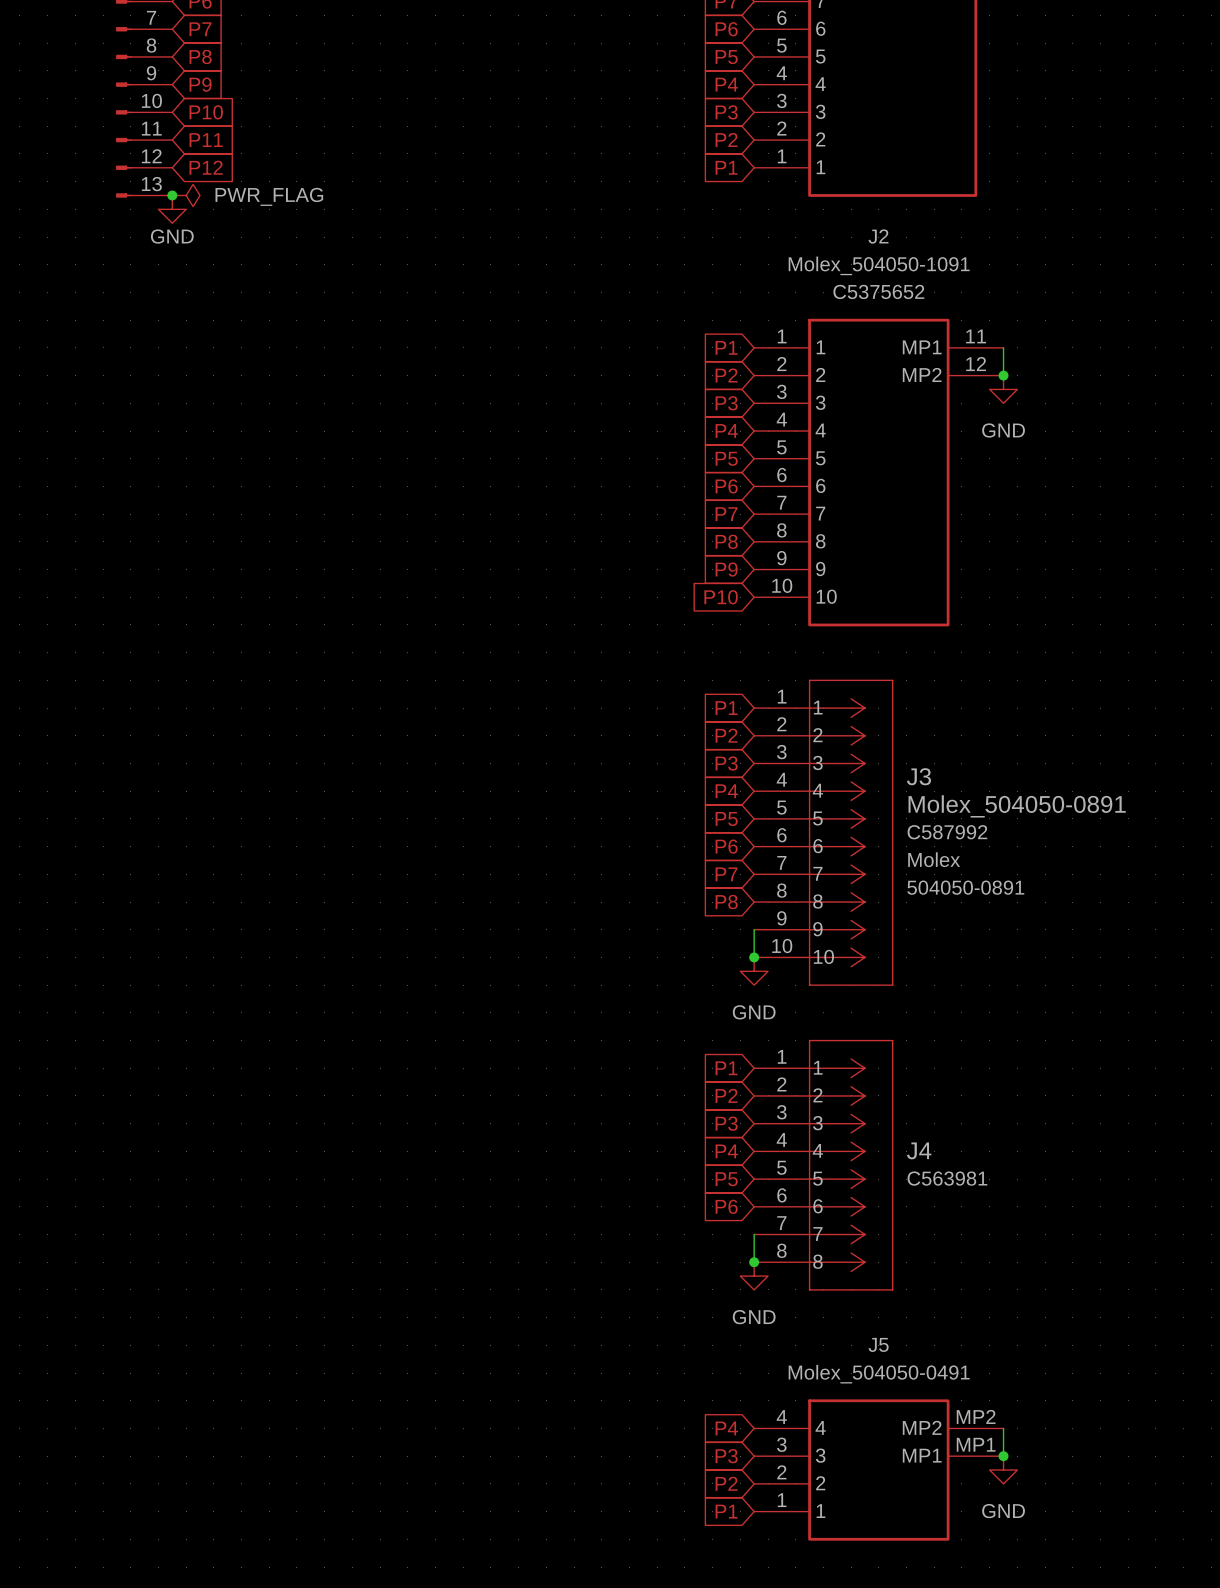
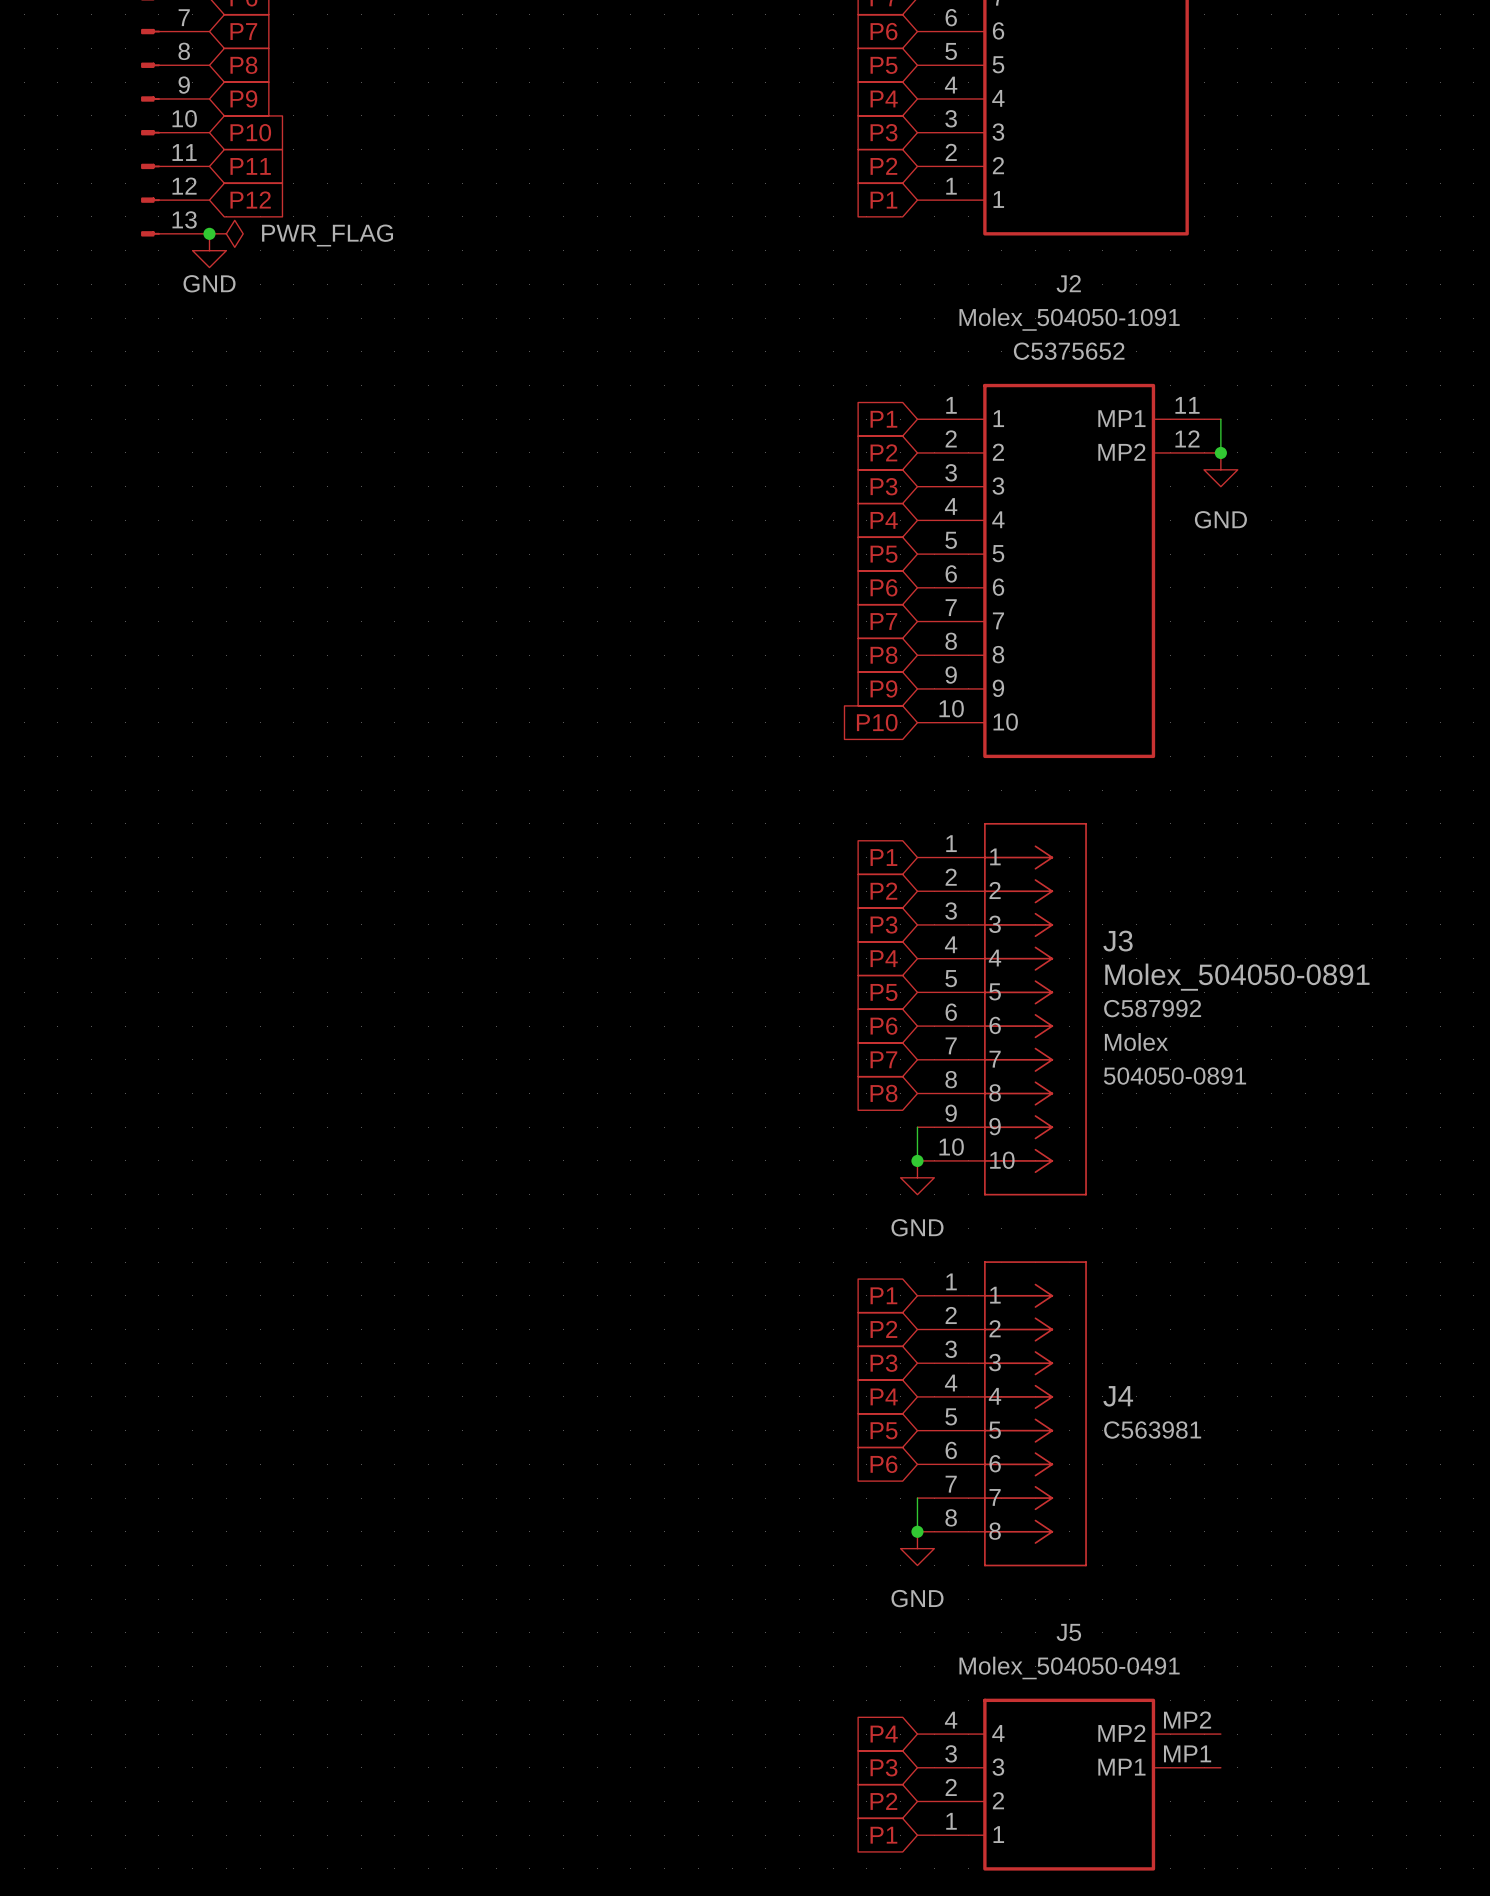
wire: (1003, 1428) (1003, 1456) -> none
junction: (1003, 1456) -> none
power symbol: GND (1003, 1470) -> none

